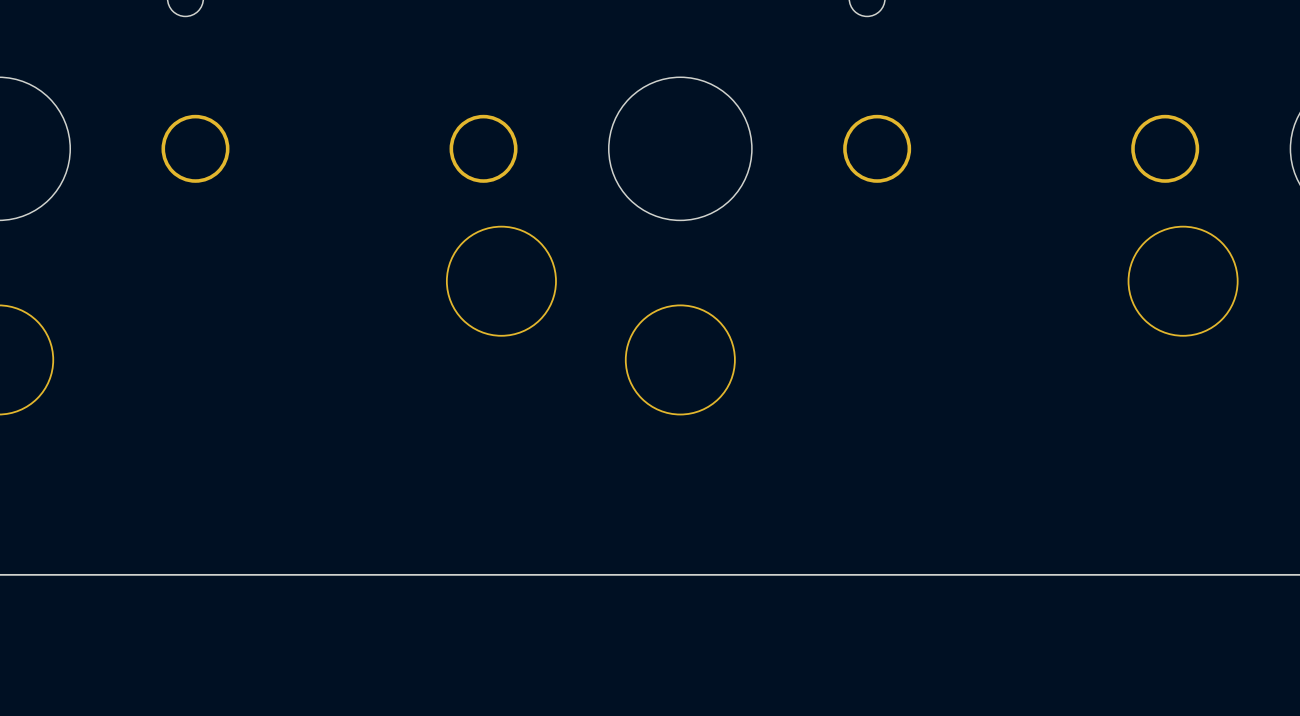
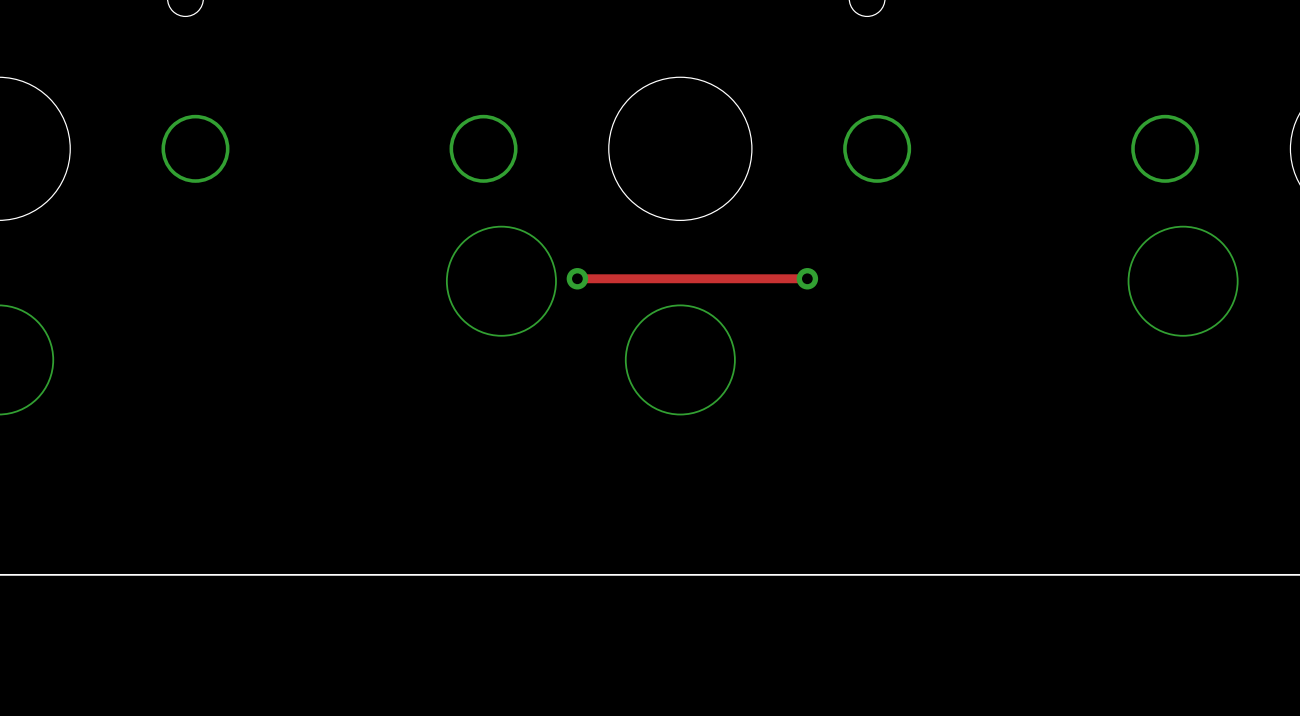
track: none -> (577, 278) (807, 278)
via: none -> (577, 278)
via: none -> (807, 278)

